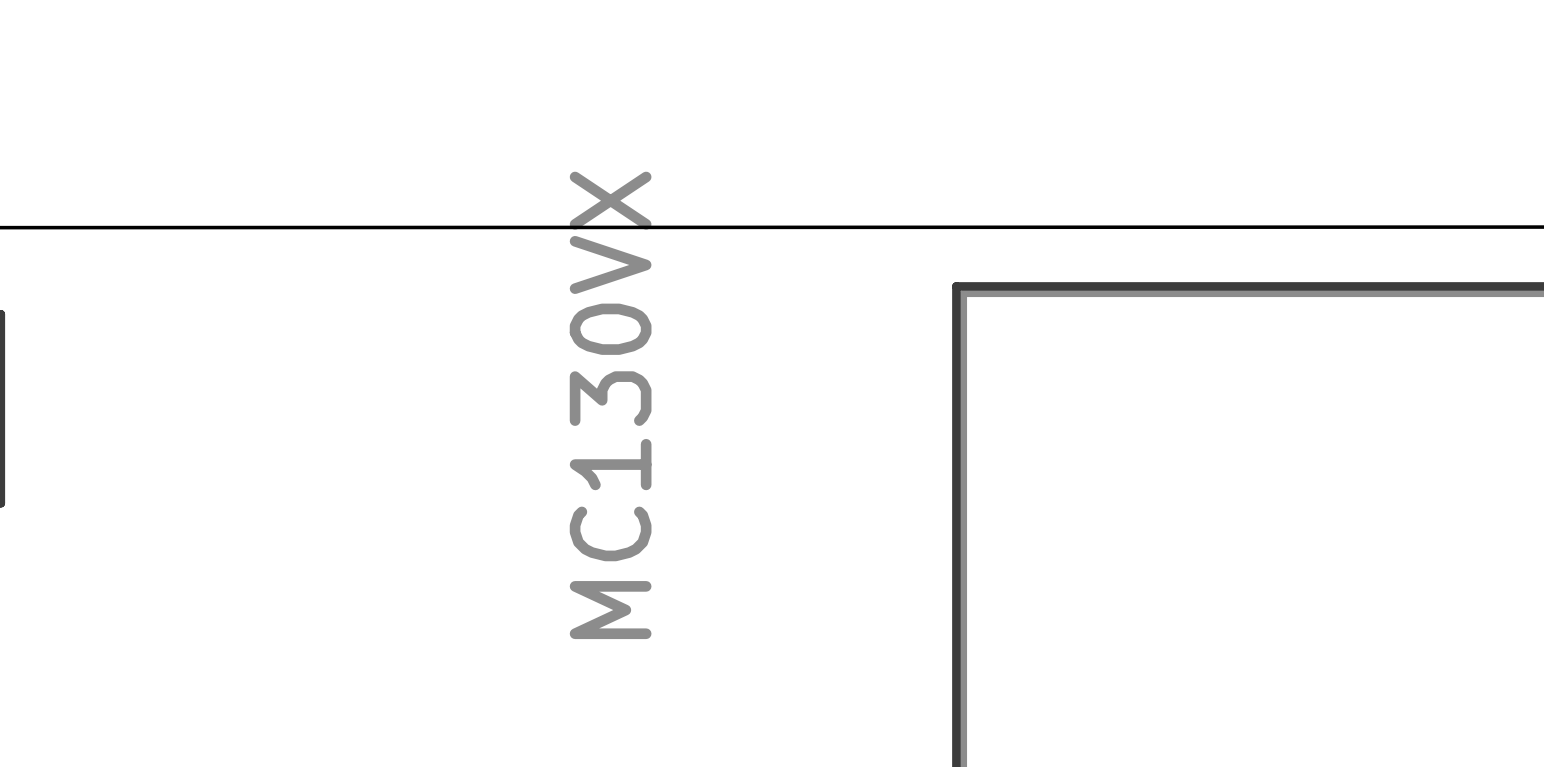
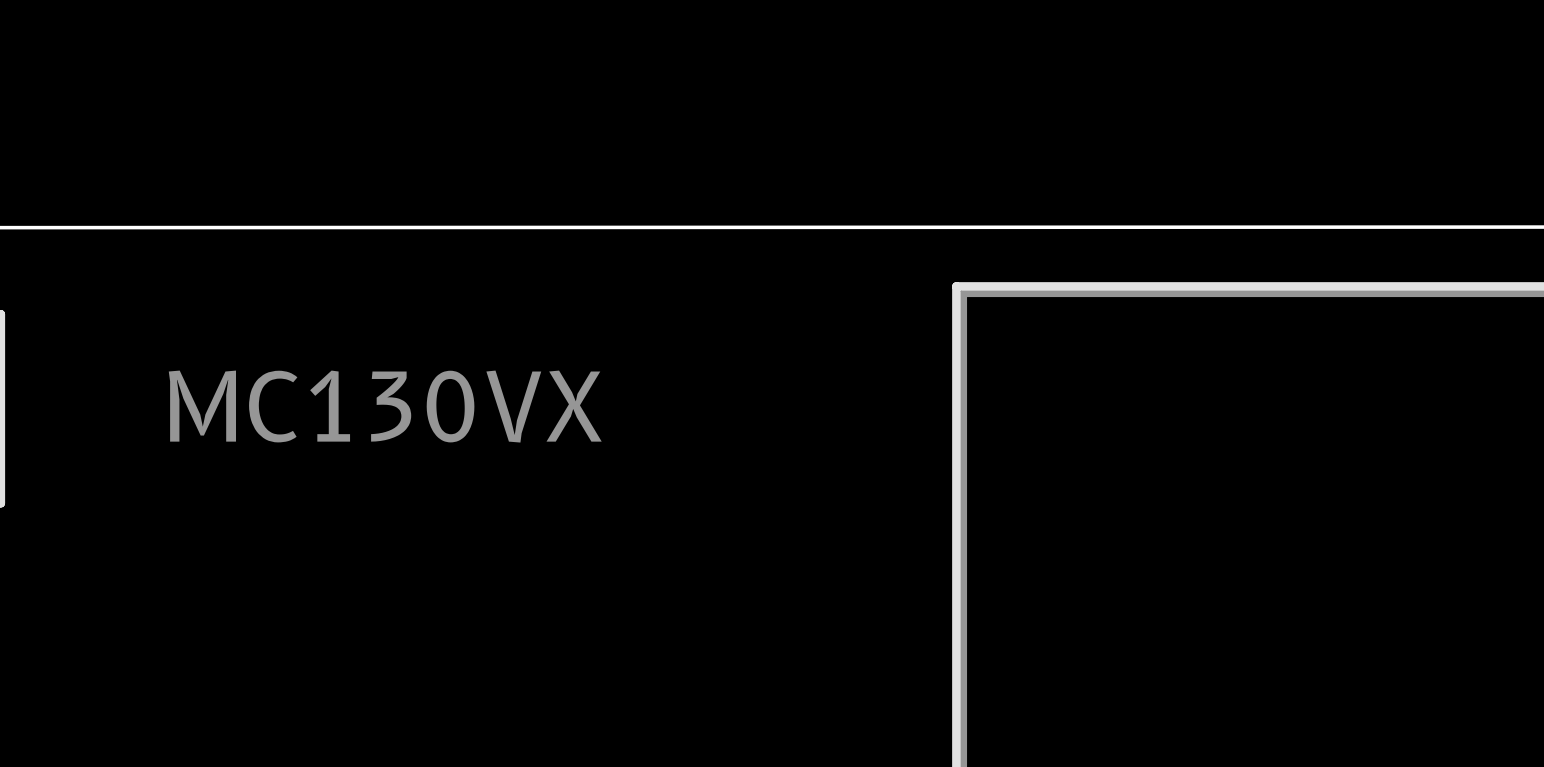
part value rotation: 0° (610, 405) -> 90° clockwise (385, 406)

